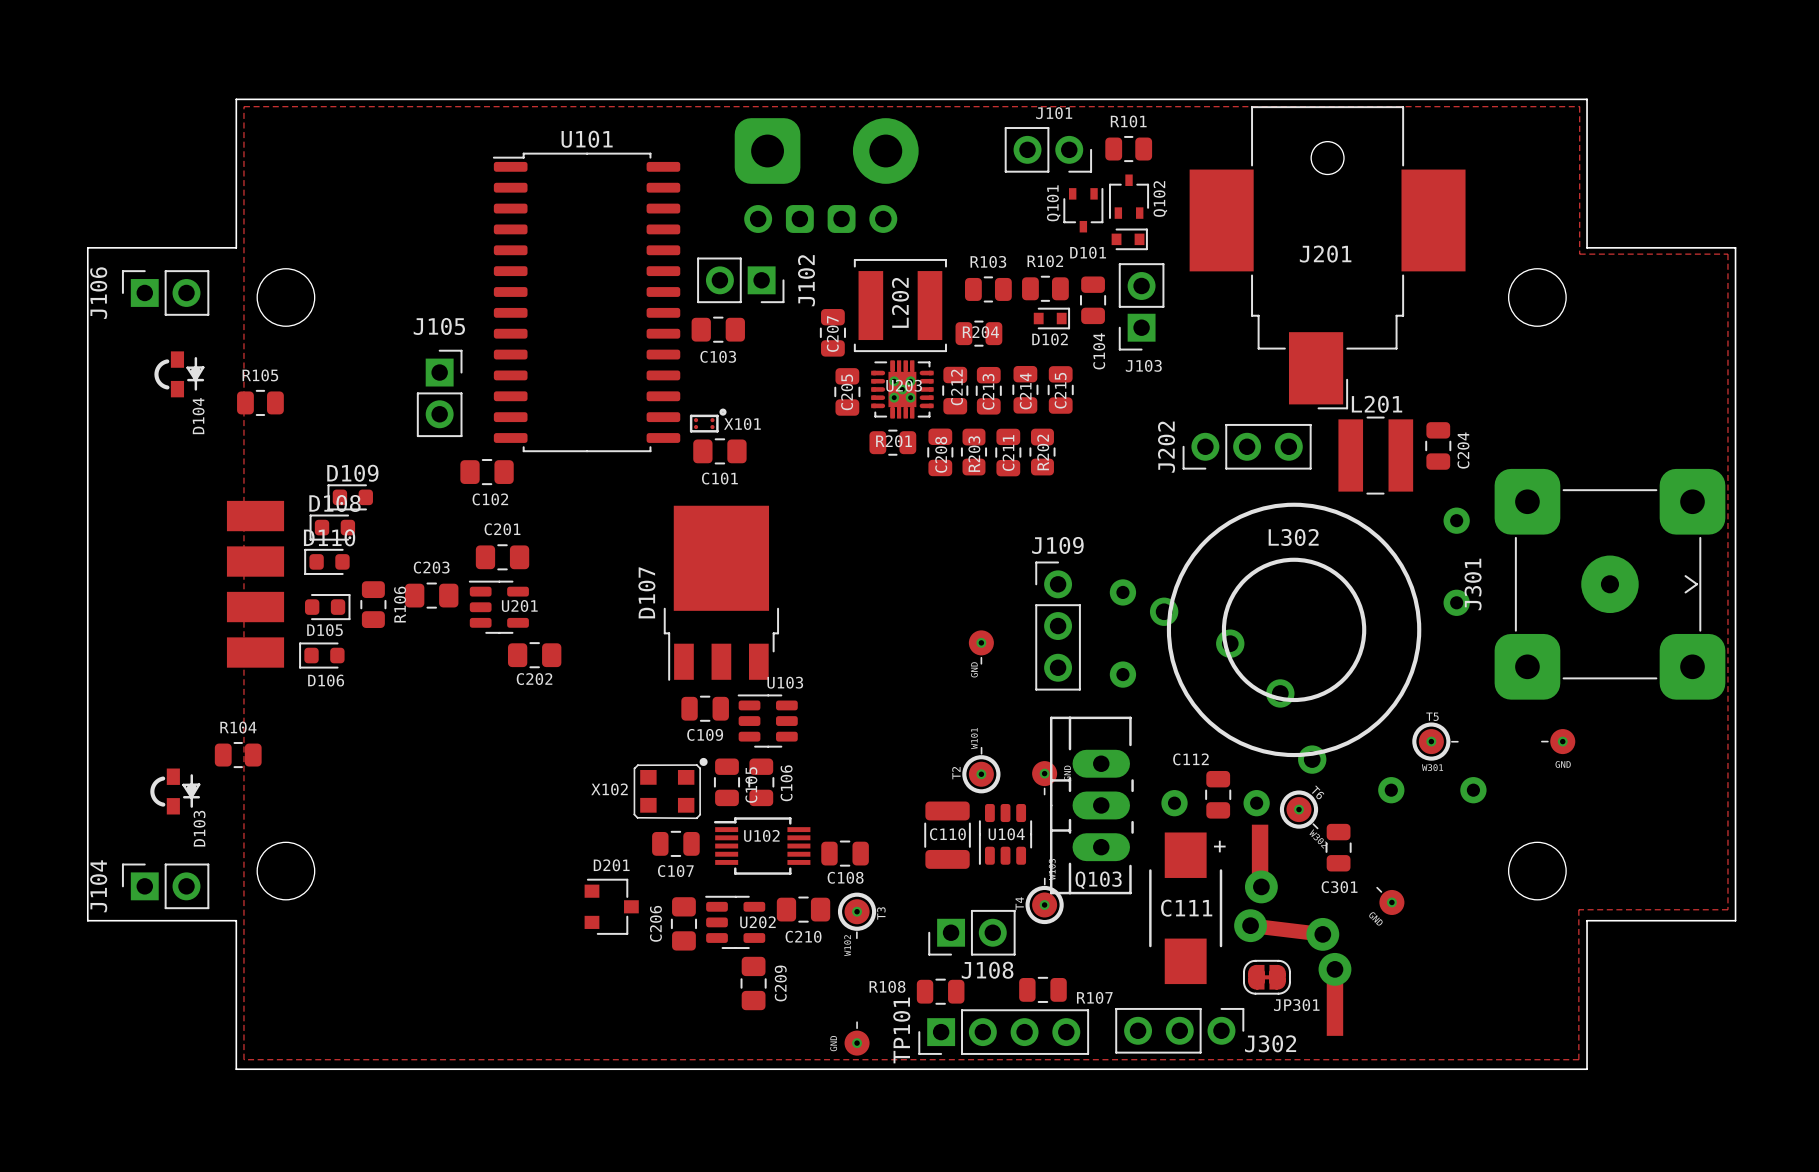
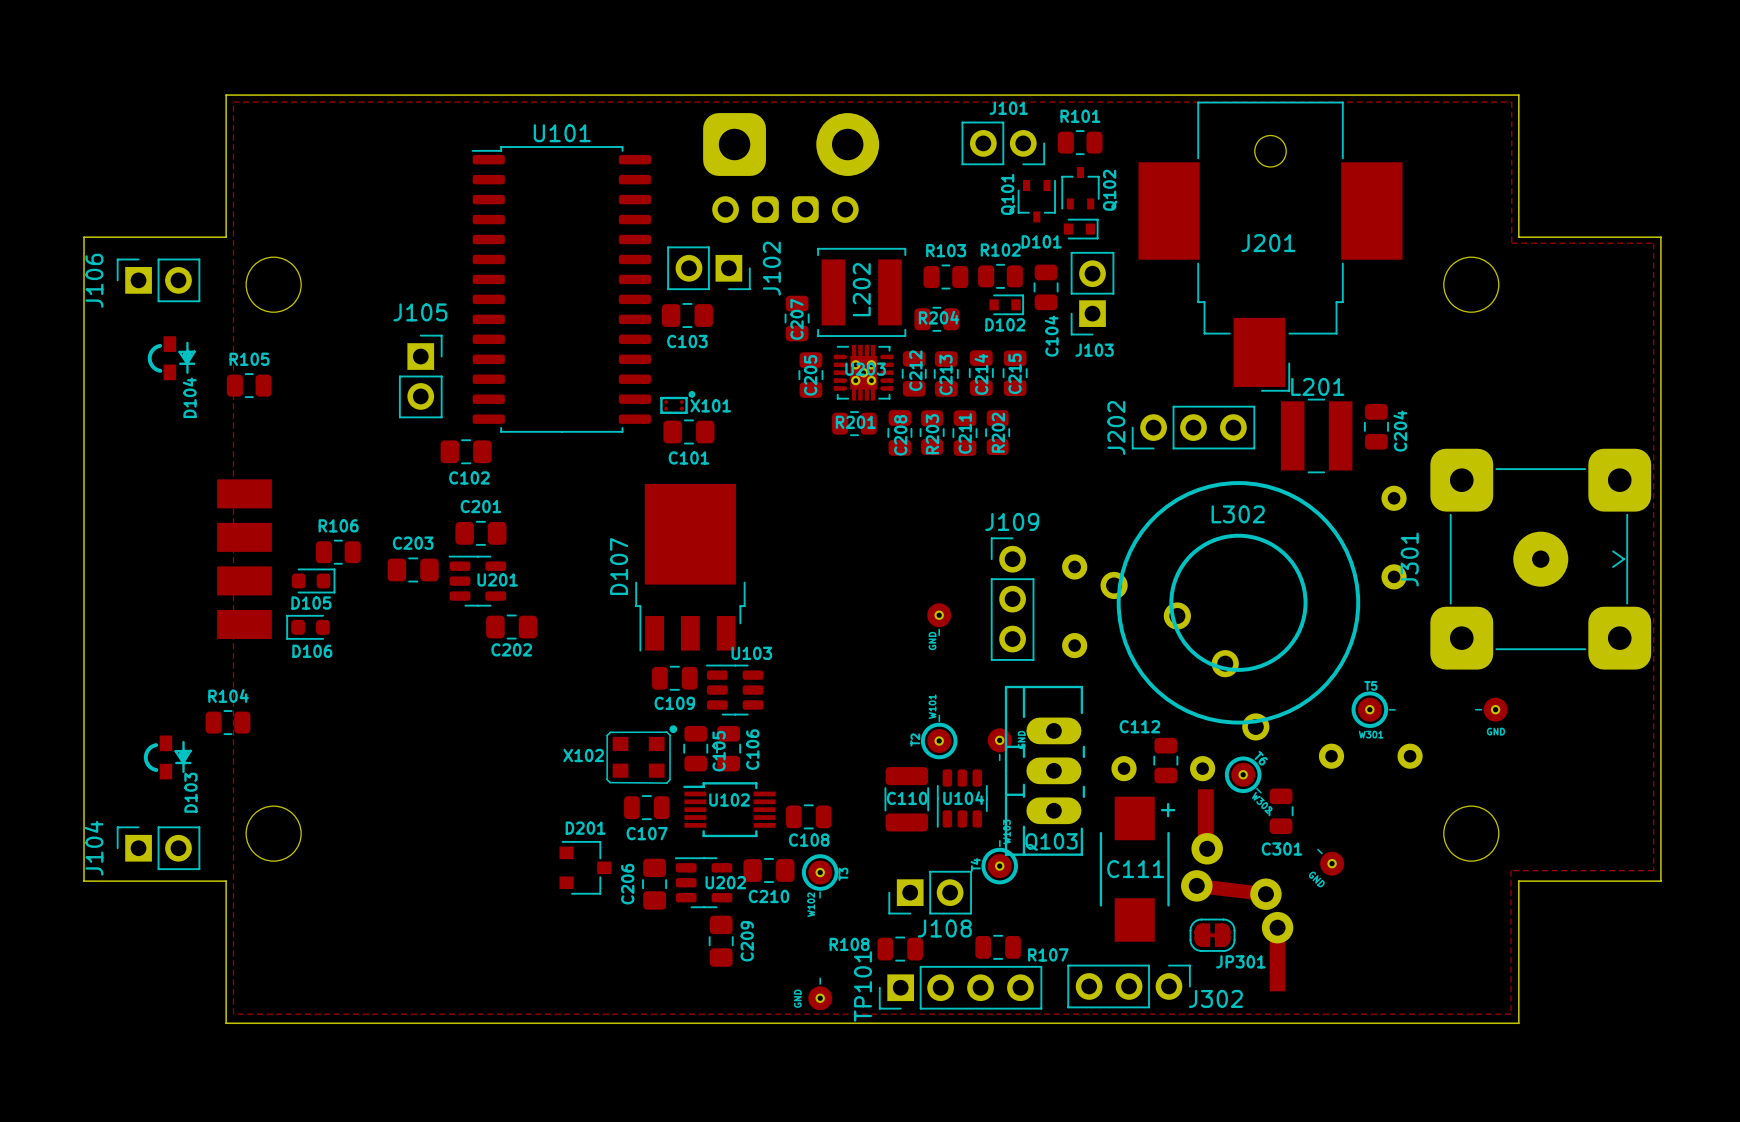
D109: (350, 497) -> none
D108: (332, 527) -> none
D110: (326, 561) -> none
R106 rotation: 0° (373, 604) -> 90° clockwise (338, 552)
R106 position: (373, 604) -> (338, 552)
R106 name position: R106 (400, 604) -> R106 (338, 525)

